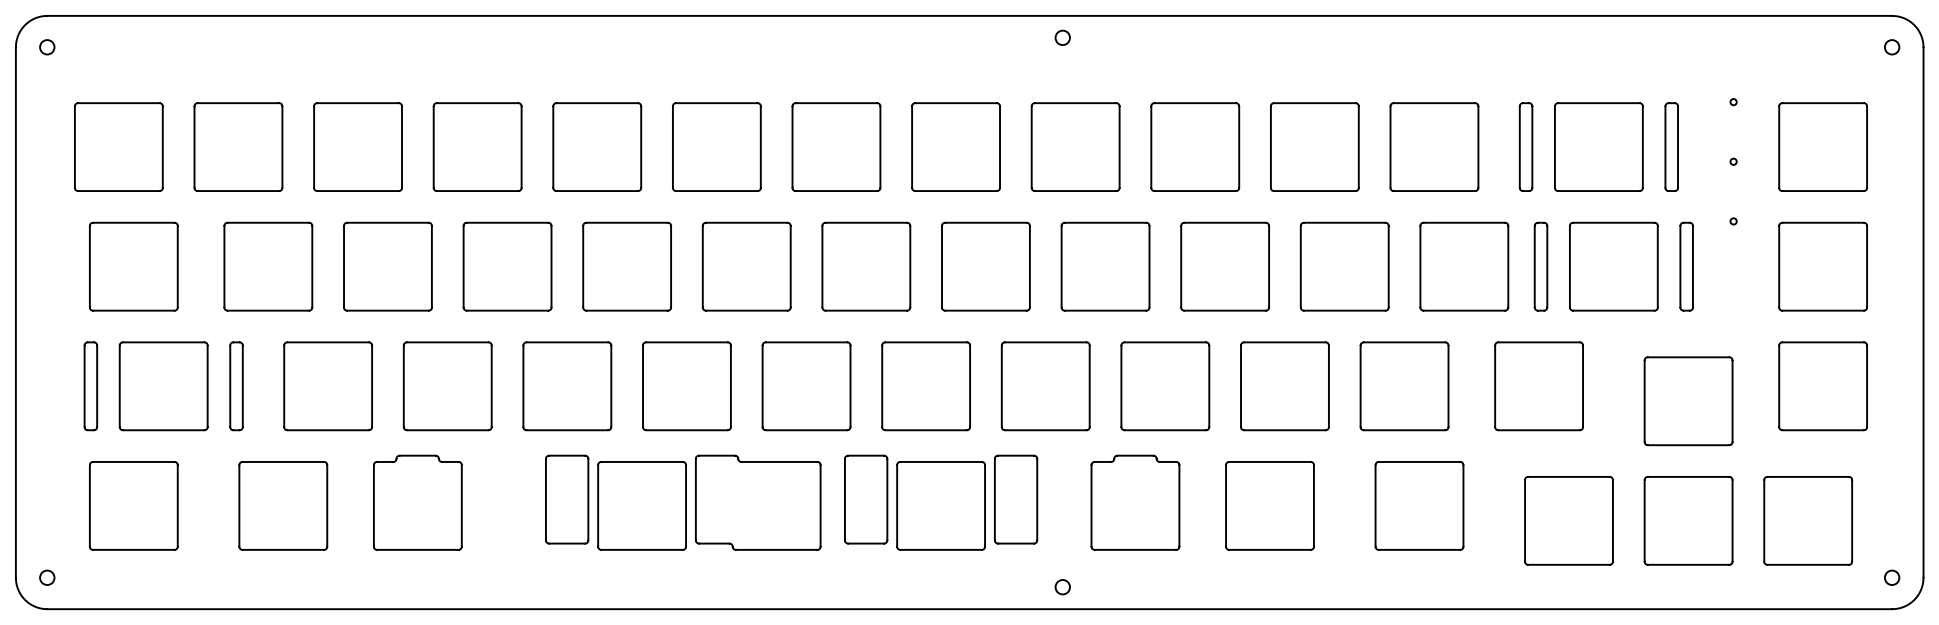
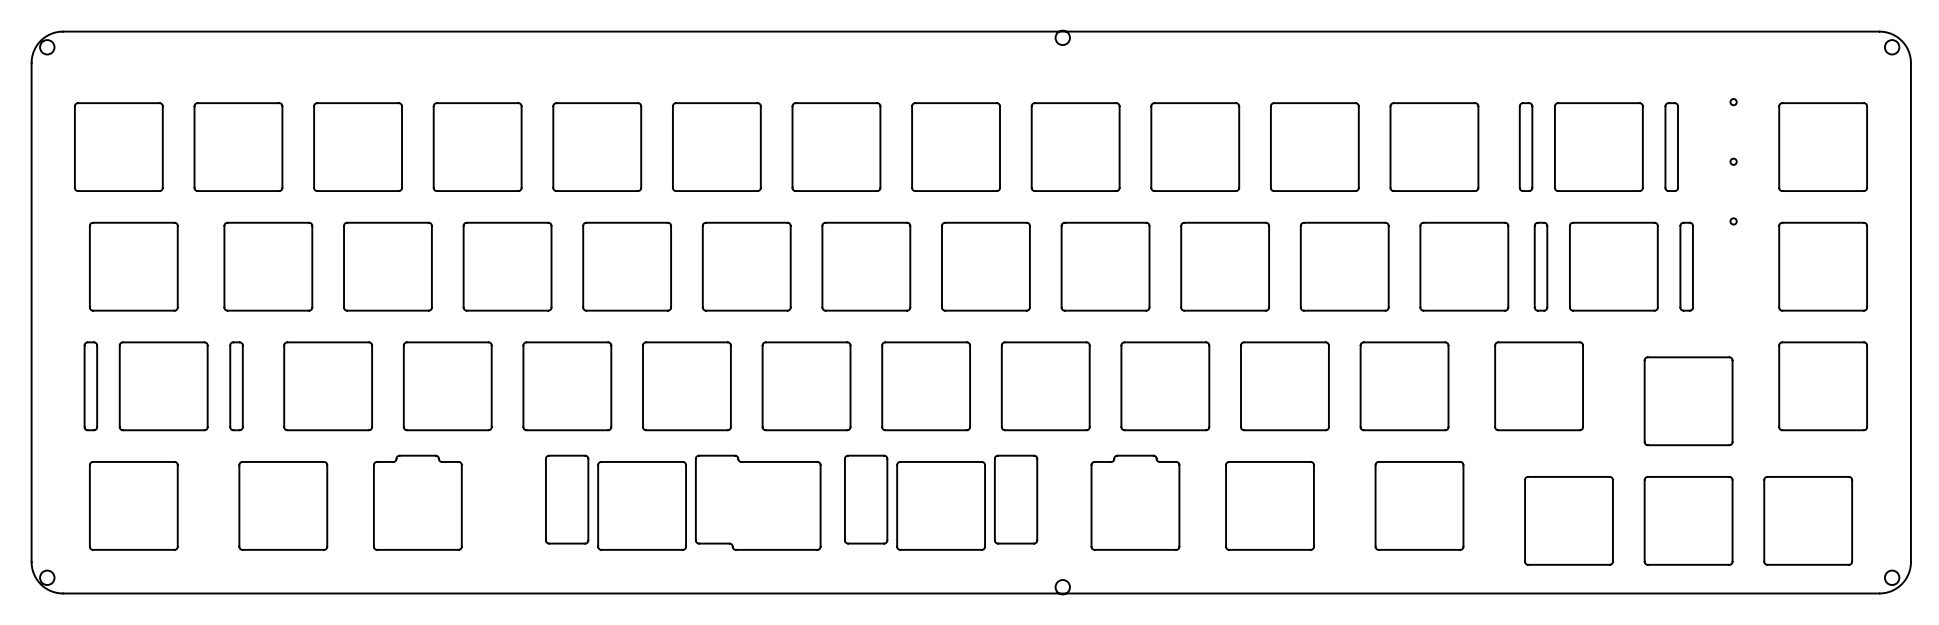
board edge: (47, 15) (1892, 15) (1902, 17) (1911, 22) (1918, 30) (1923, 47) (1923, 577) (1921, 588) (1911, 602) (1902, 607) (1892, 609) (47, 609) (36, 607) (22, 597) (17, 588) (15, 577) (15, 47) (19, 33) (25, 25) (36, 17) (47, 15) -> (62, 31) (52, 33) (40, 40) (34, 49) (31, 62) (31, 562) (33, 572) (38, 581) (52, 591) (62, 593) (1879, 593) (1889, 591) (1899, 586) (1909, 572) (1910, 562) (1910, 62) (1906, 46) (1899, 38) (1889, 33) (1879, 31) (62, 31)

